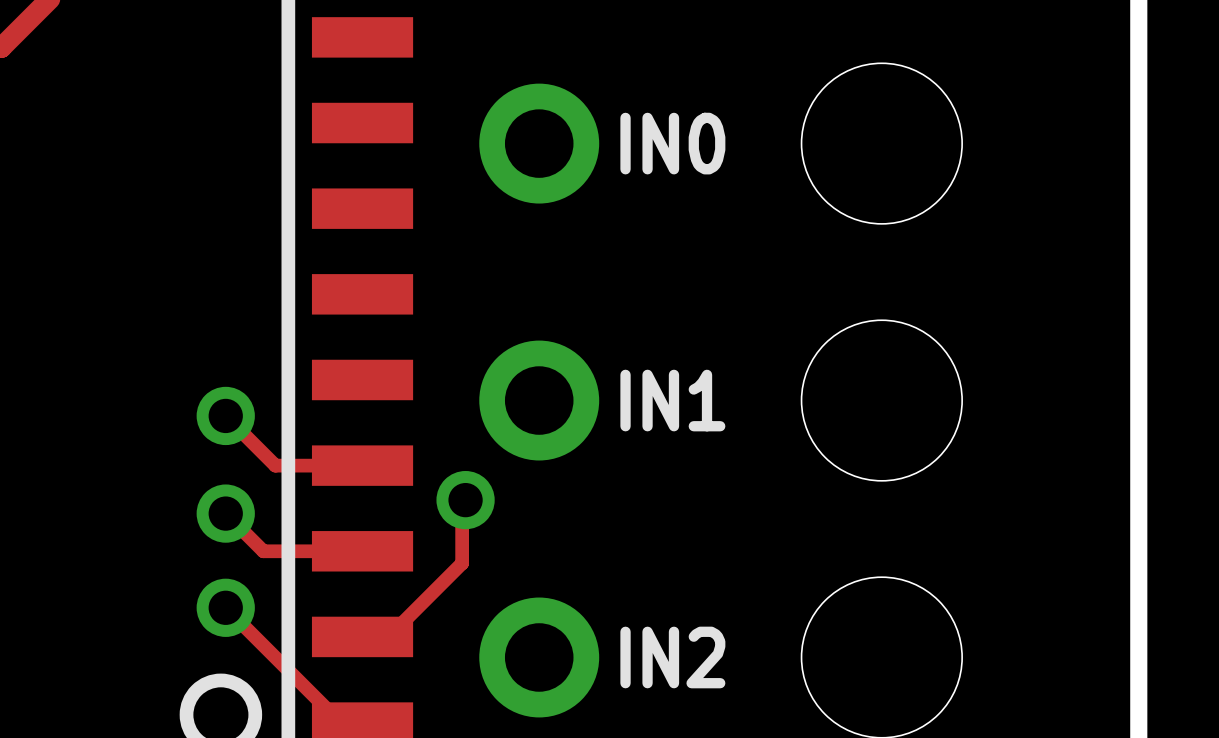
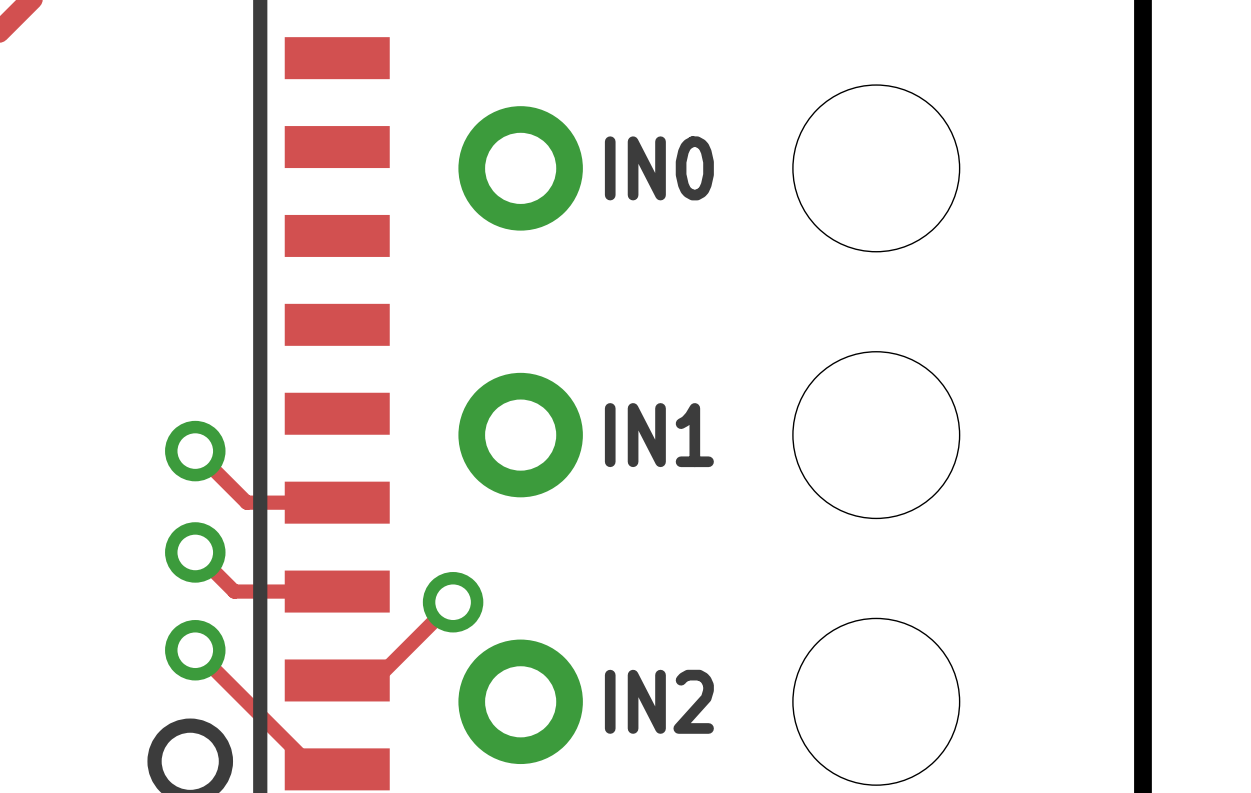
track: (465, 500) (462, 503) (462, 563) (398, 626) (398, 636) -> (453, 602) (374, 680)
via position: (465, 500) -> (453, 602)

